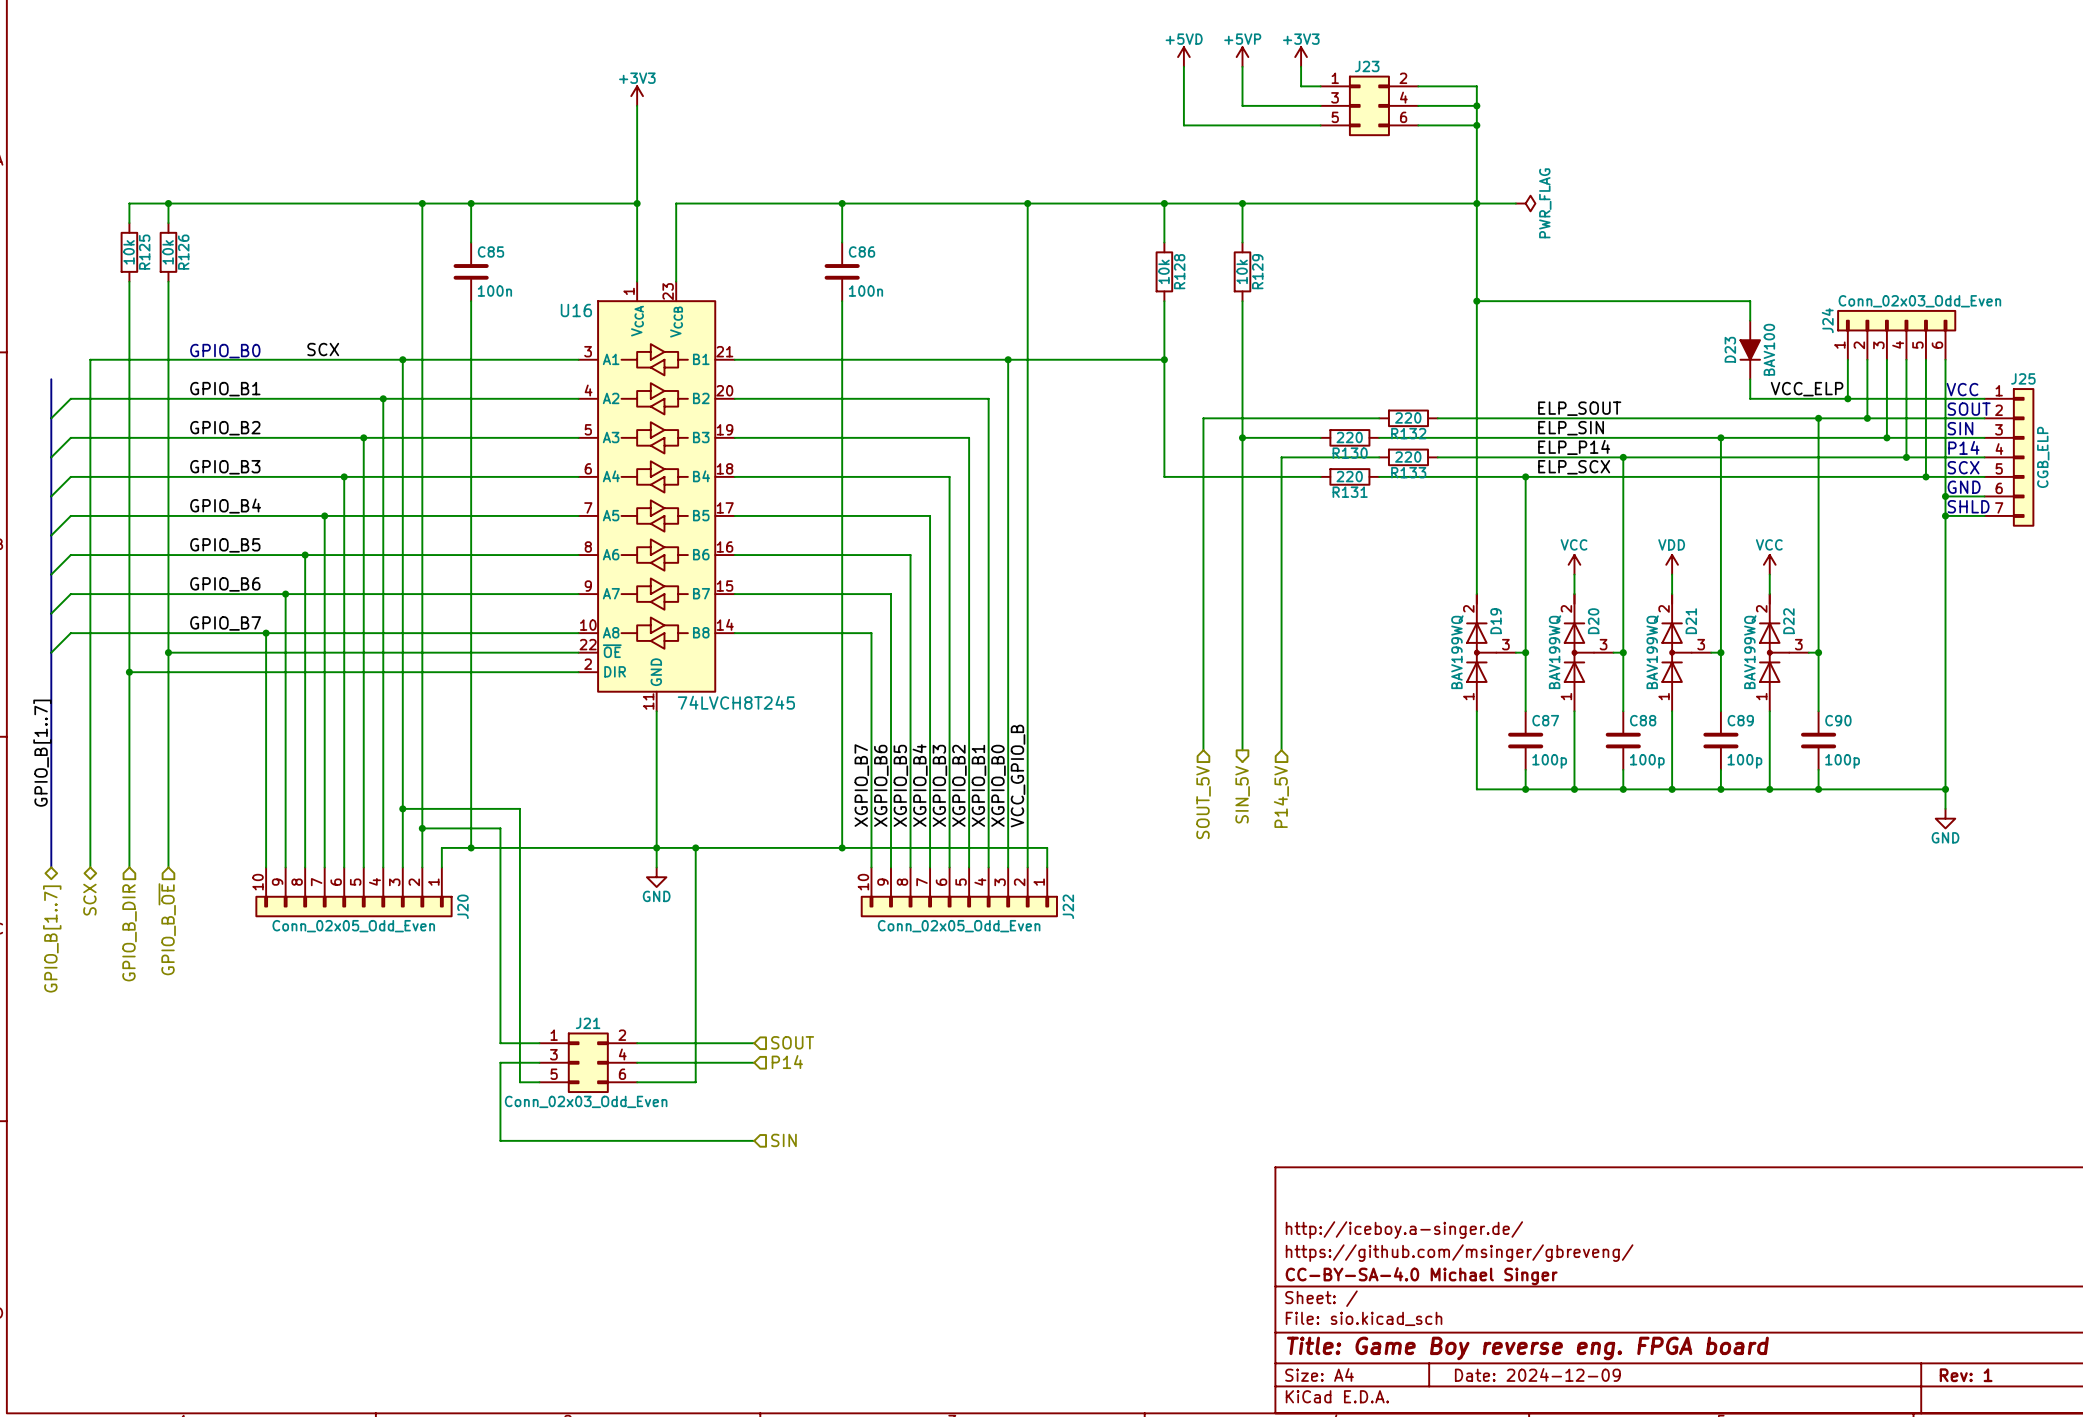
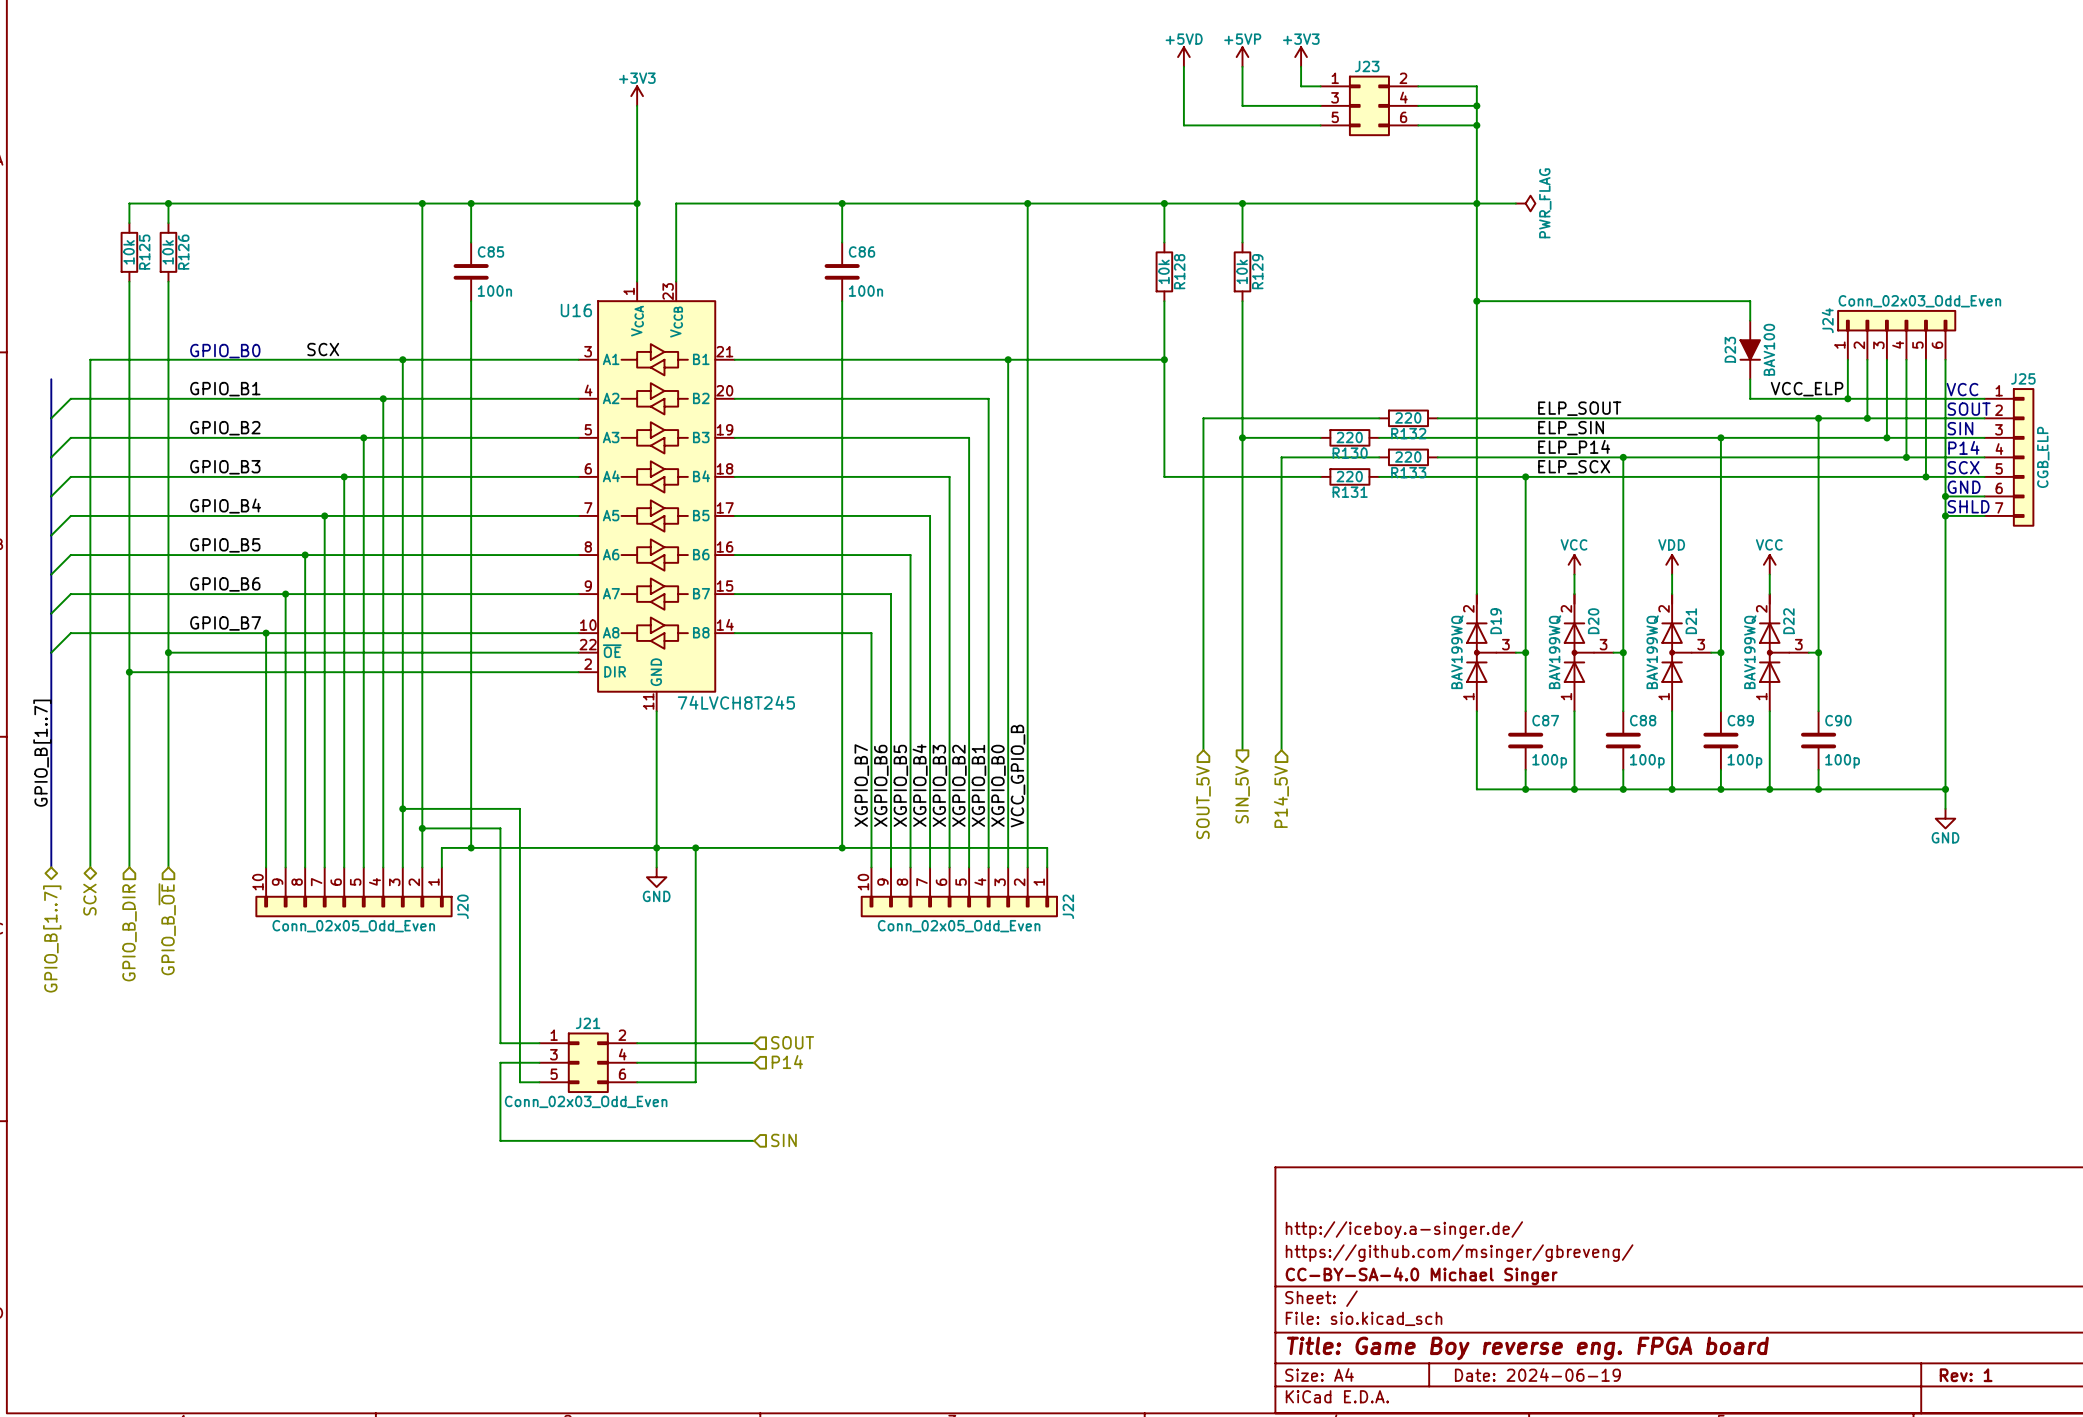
title block: Date: 2024-12-09 (1537, 1374) -> Date: 2024-06-19 (1537, 1374)

